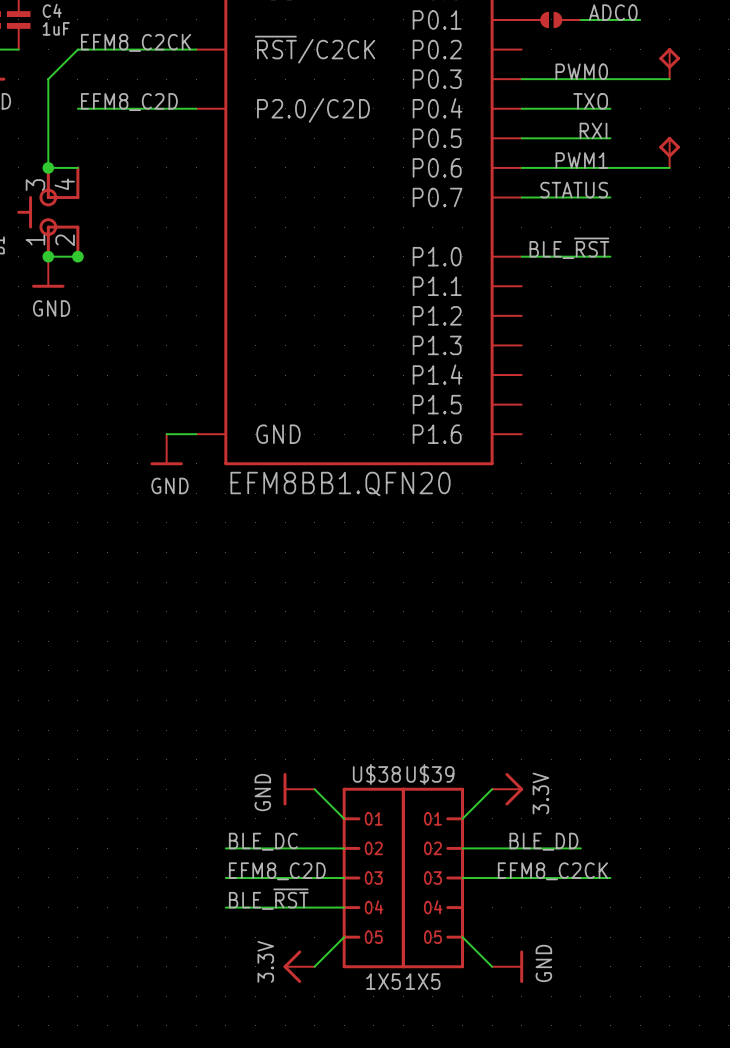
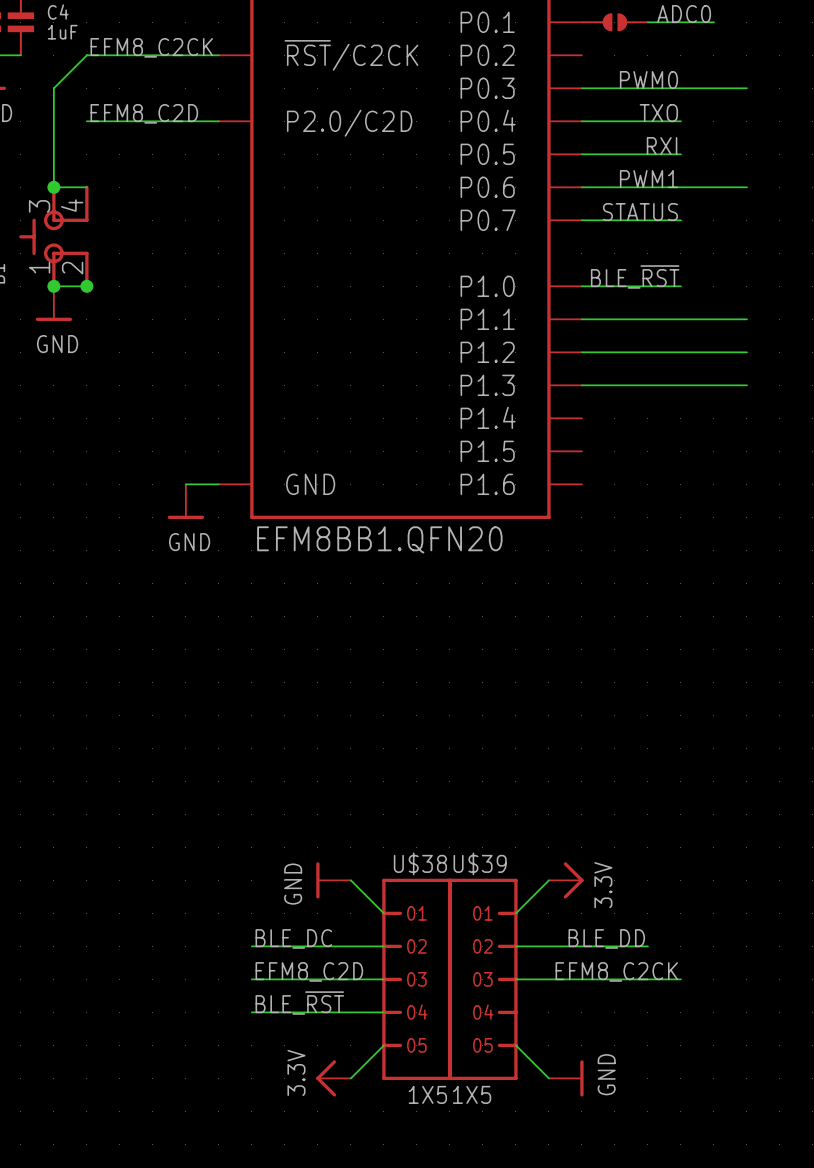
part: (669, 63) -> none
part: (669, 152) -> none
wire: none -> (581, 319) (746, 319)
wire: none -> (581, 352) (746, 352)
wire: none -> (581, 385) (746, 385)

